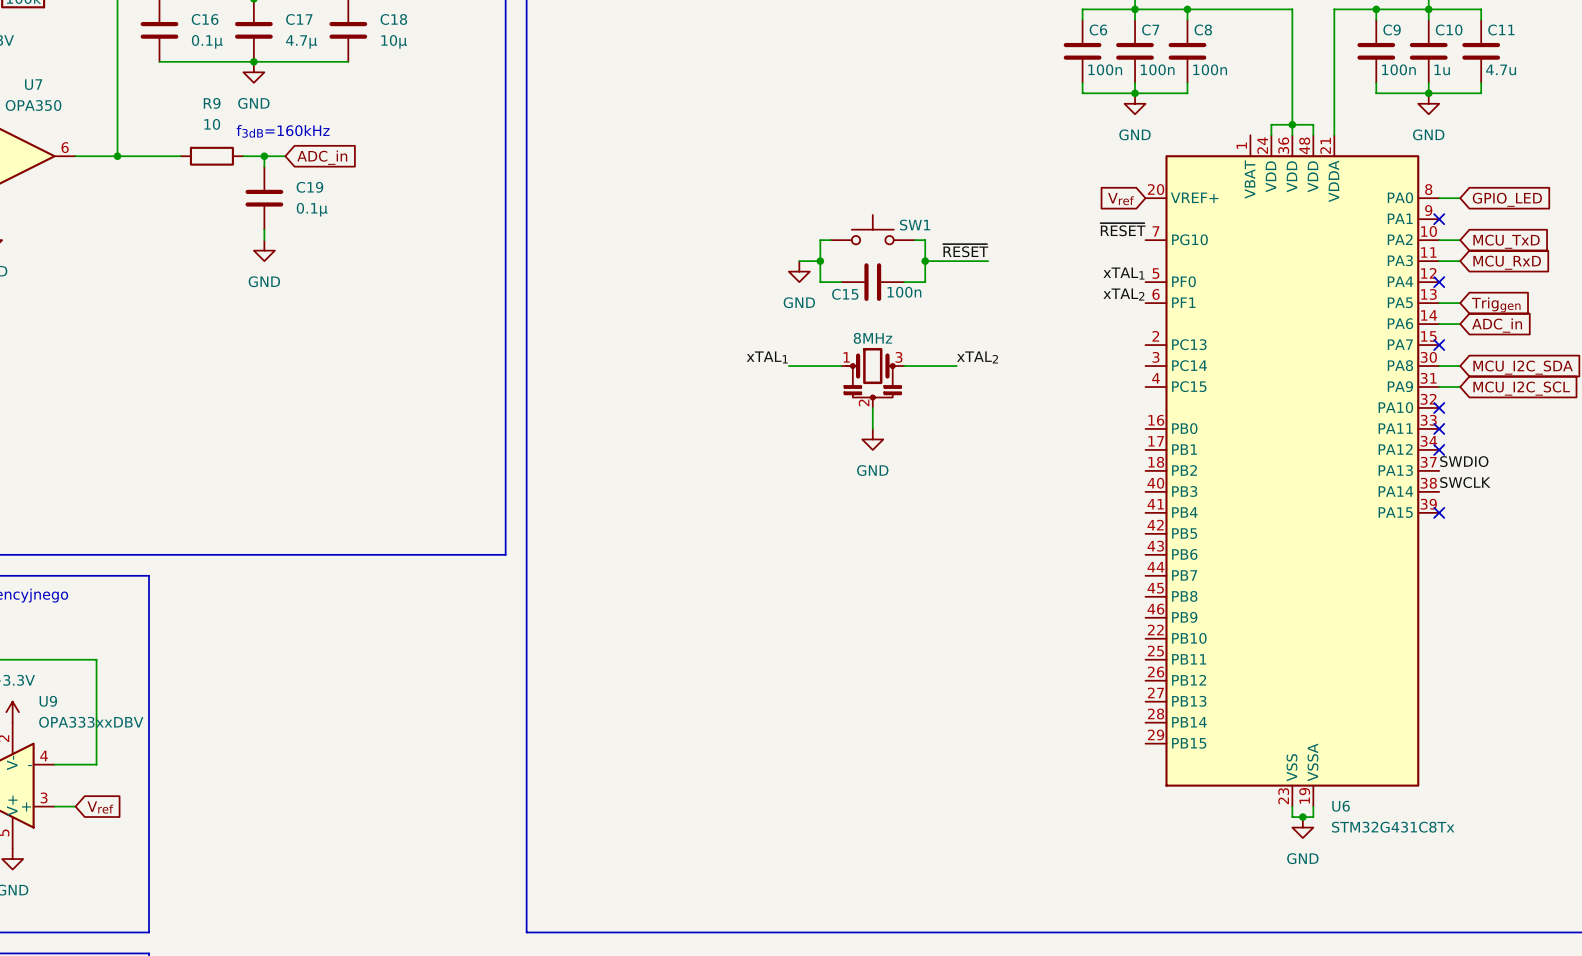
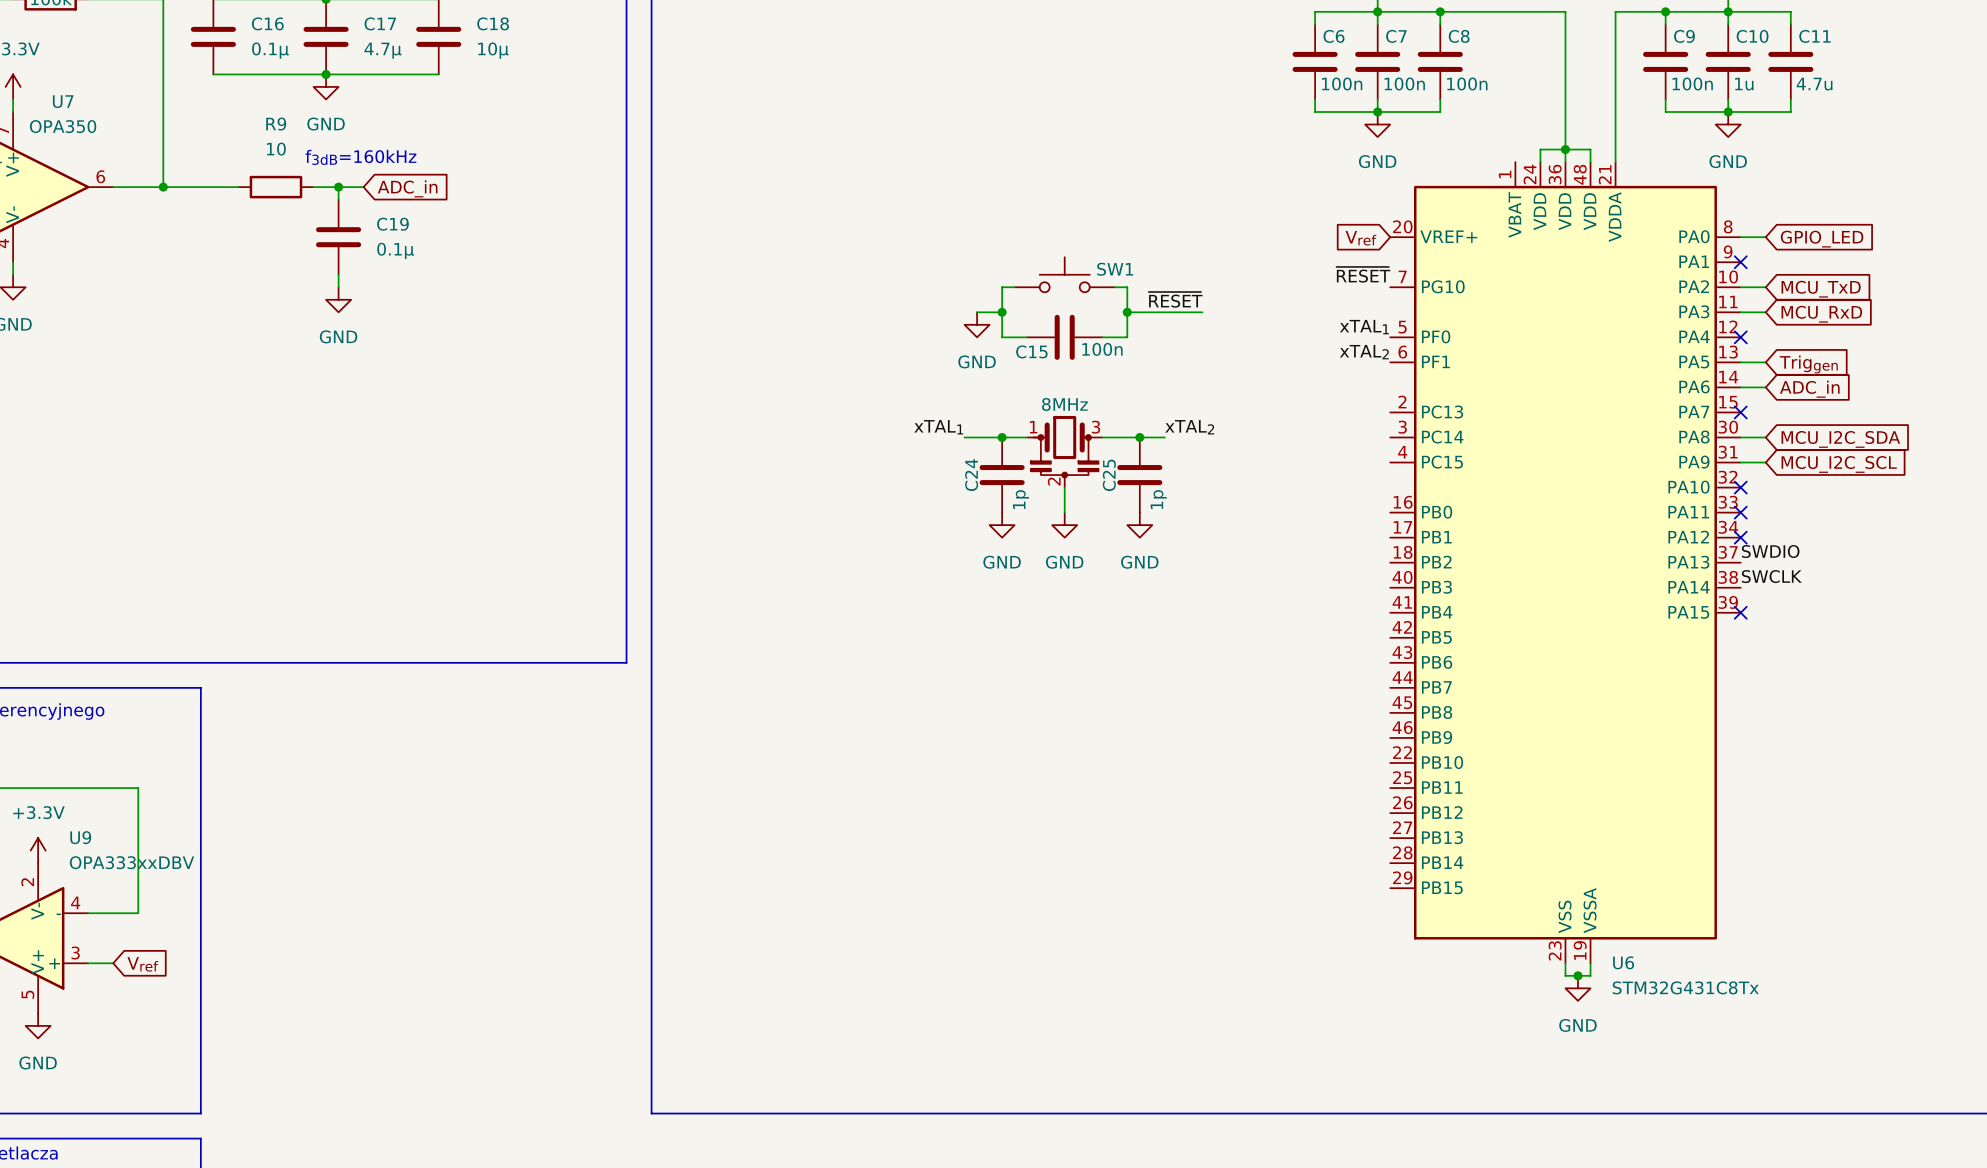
junction: none -> (1002, 437)
junction: none -> (1139, 437)
C24: none -> 1p (1002, 475)
C25: none -> 1p (1139, 475)
power symbol: none -> GND (1002, 525)
power symbol: none -> GND (1139, 525)

